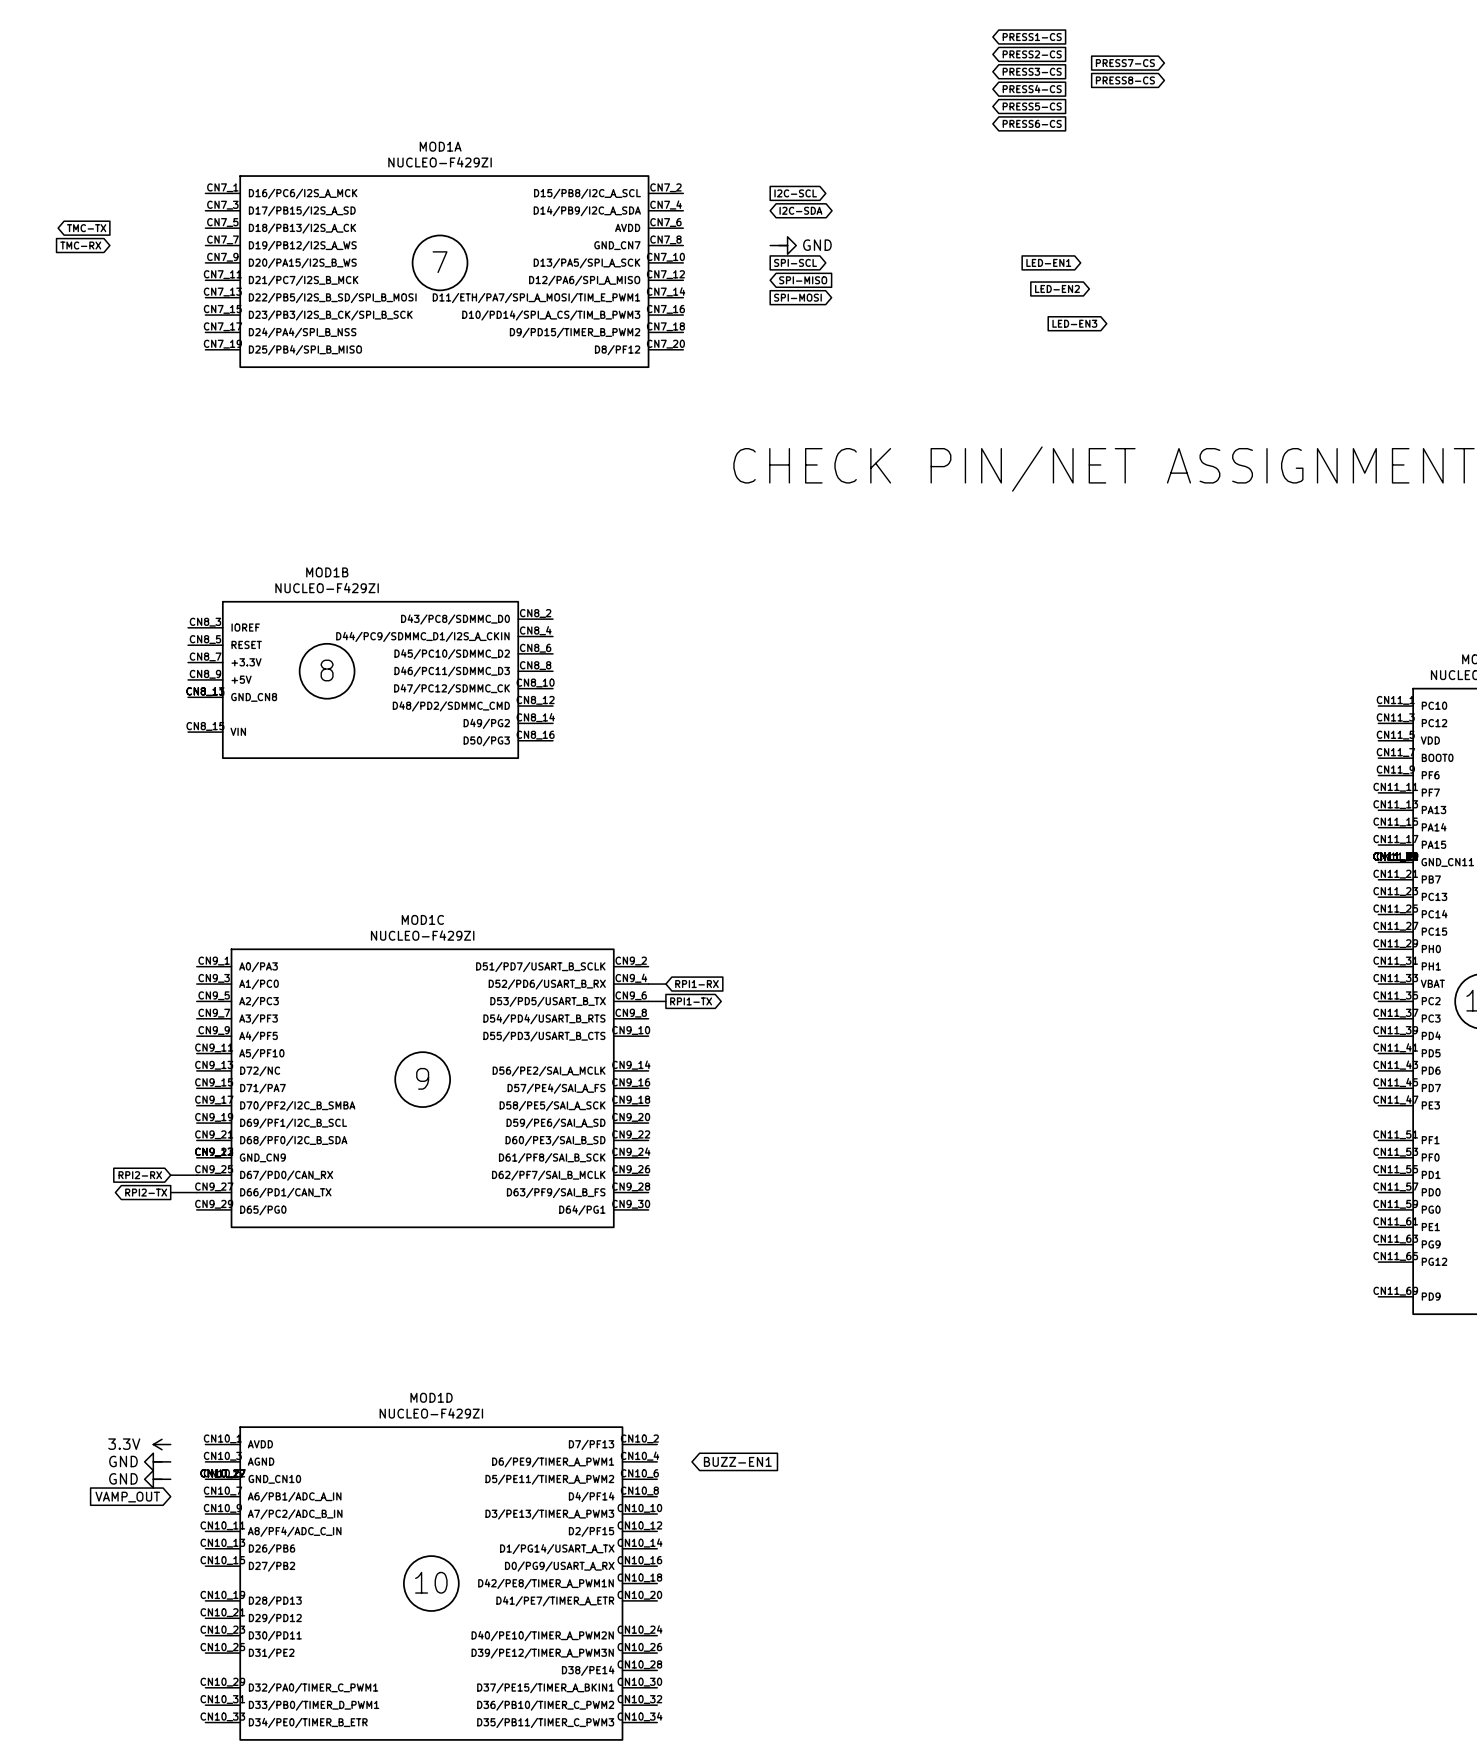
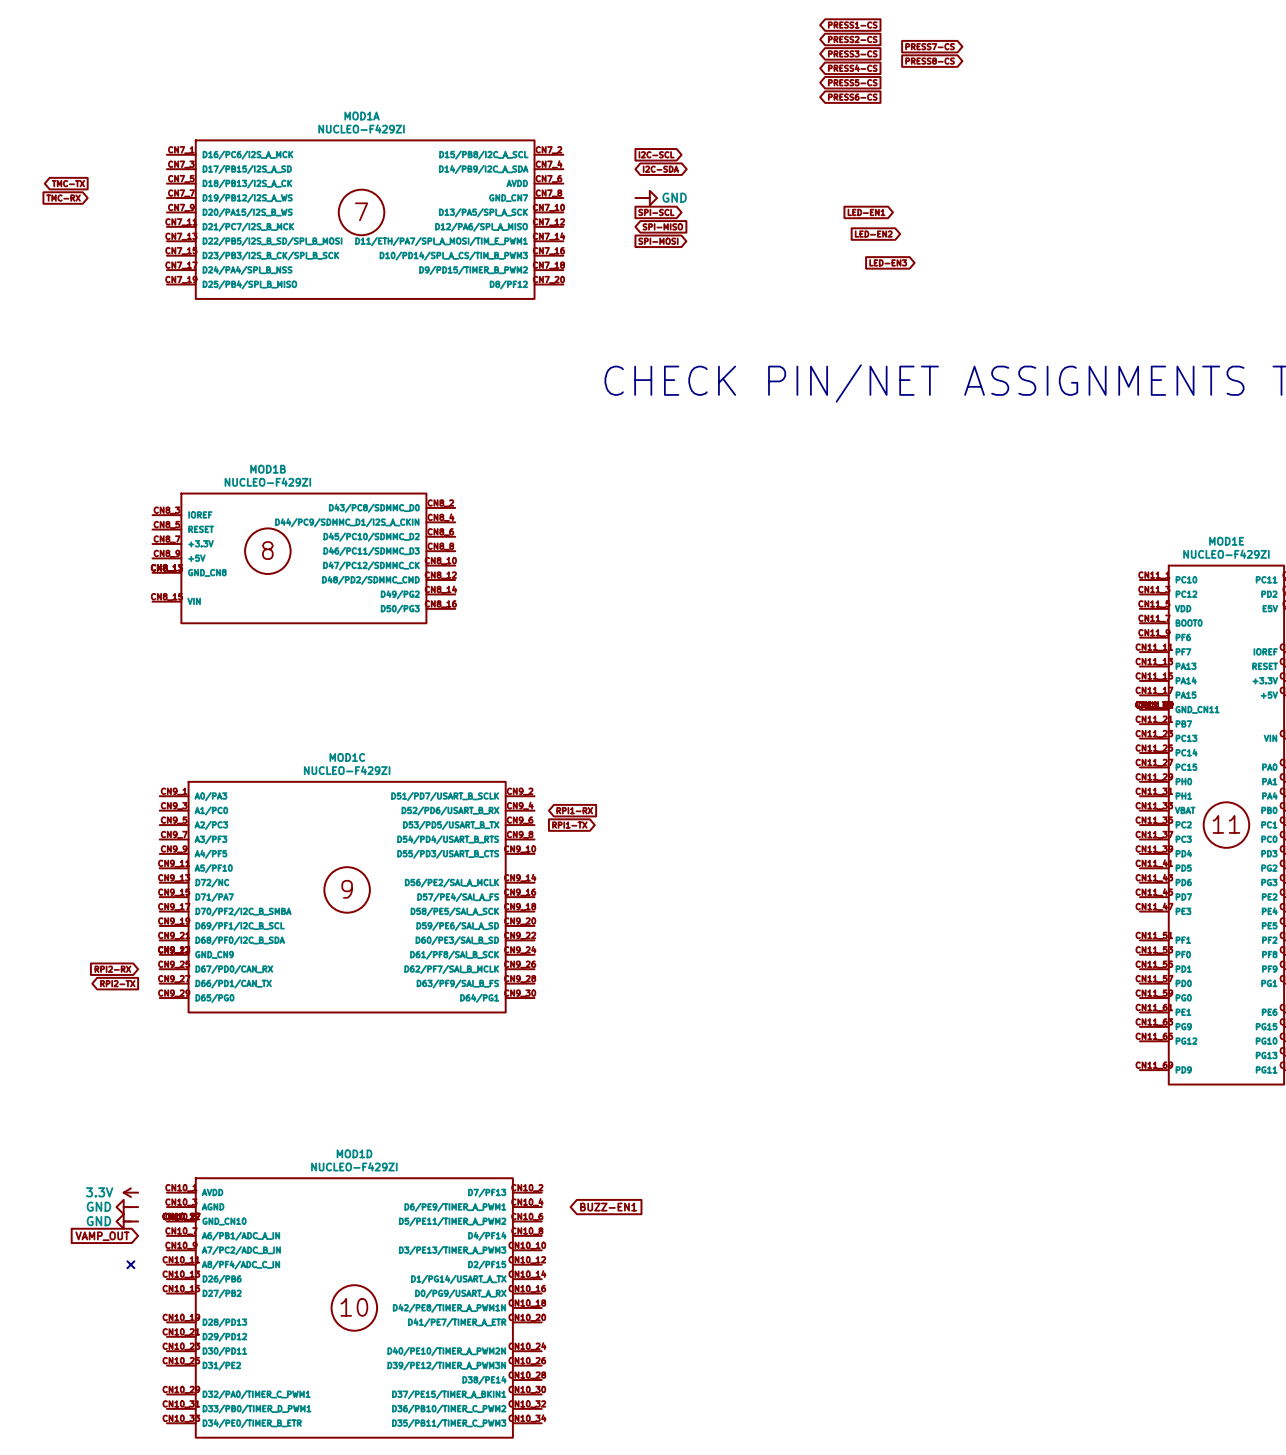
wire: (648, 984) (665, 984) -> none
wire: (648, 1001) (665, 1001) -> none
wire: (170, 1175) (196, 1175) -> none
wire: (170, 1192) (196, 1192) -> none
no-connect mark: none -> (130, 1264)

